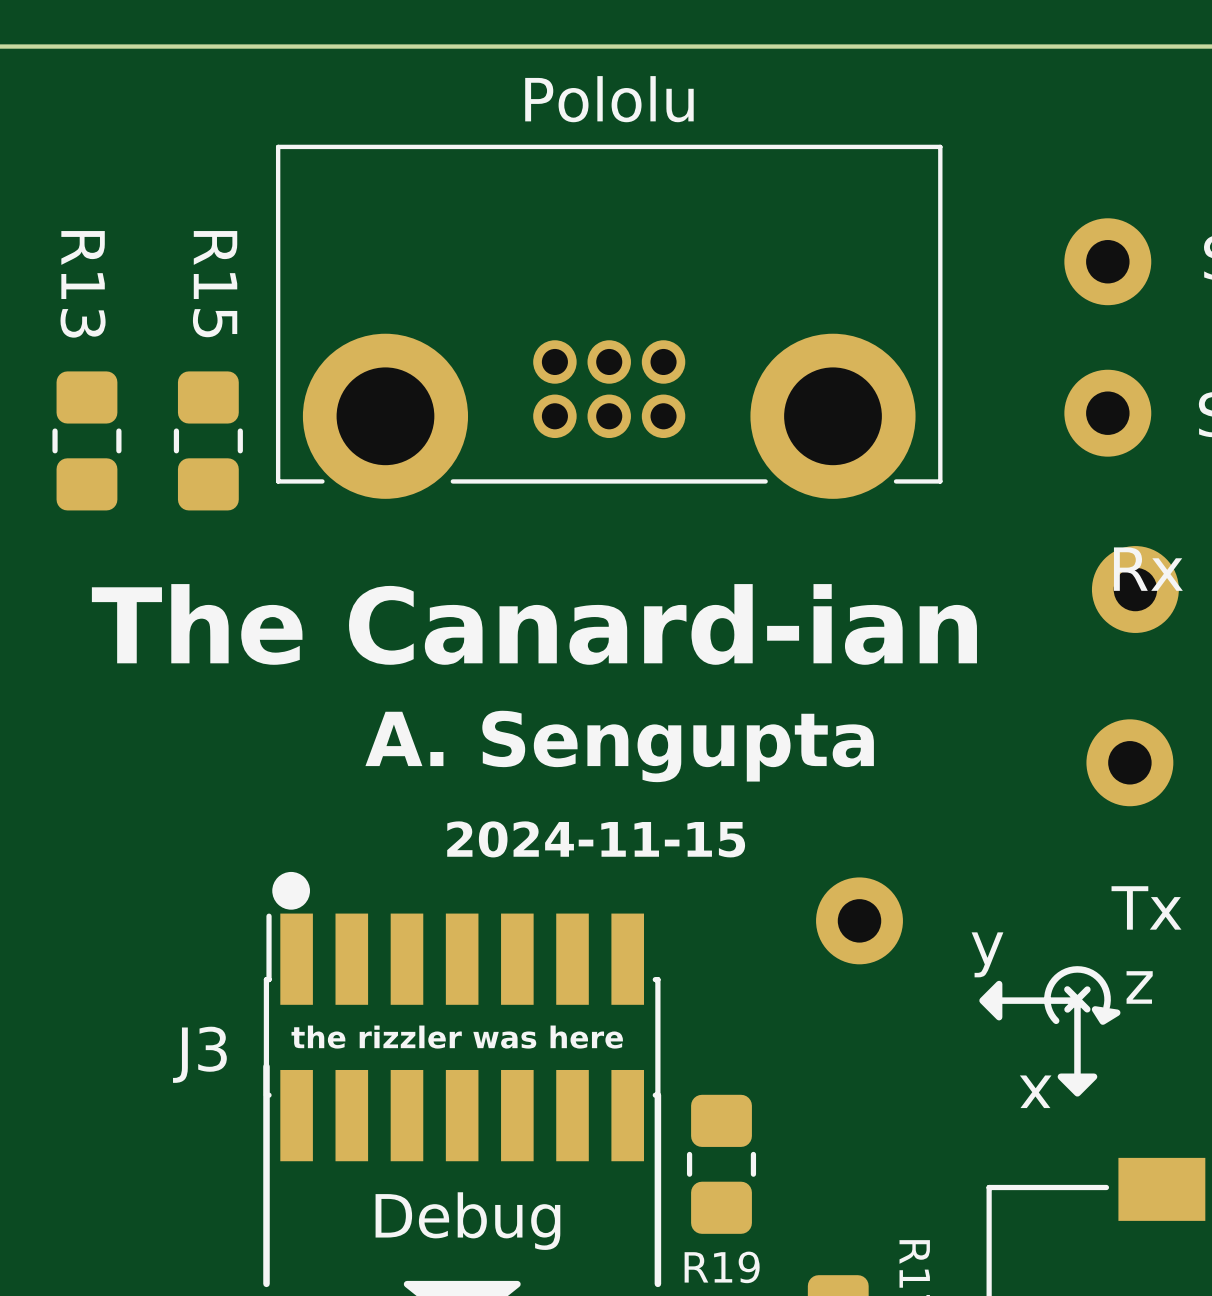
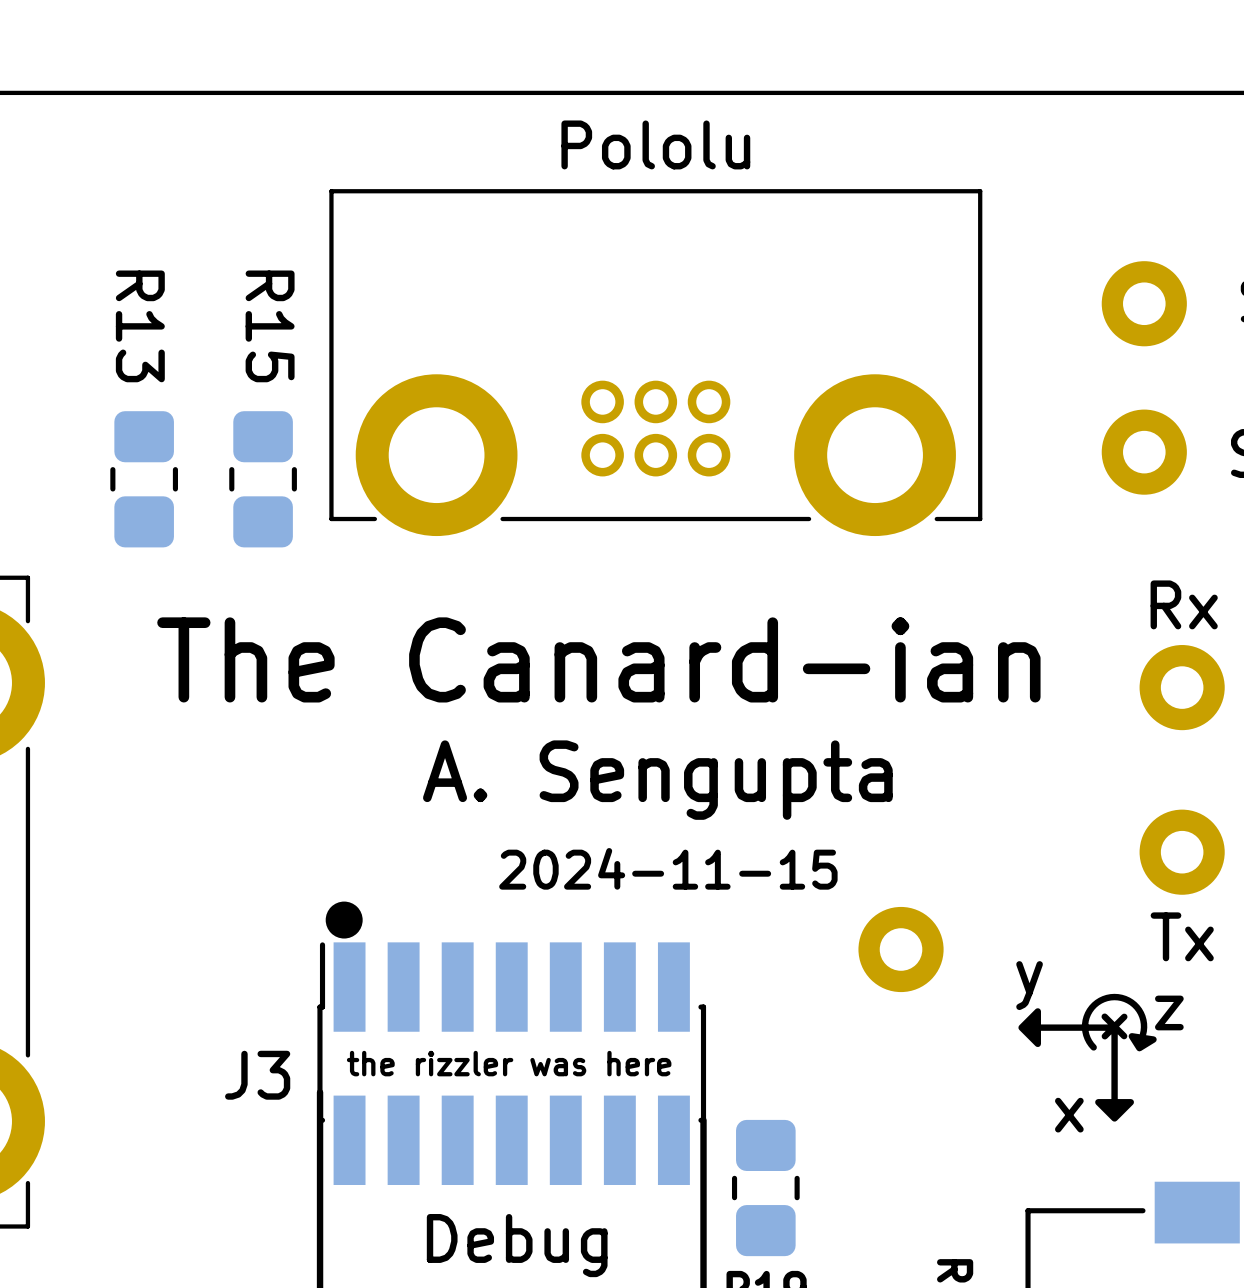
part: (1135, 589) -> none
part: none -> (1182, 687)
part: (1129, 762) -> none
part: none -> (1182, 852)

